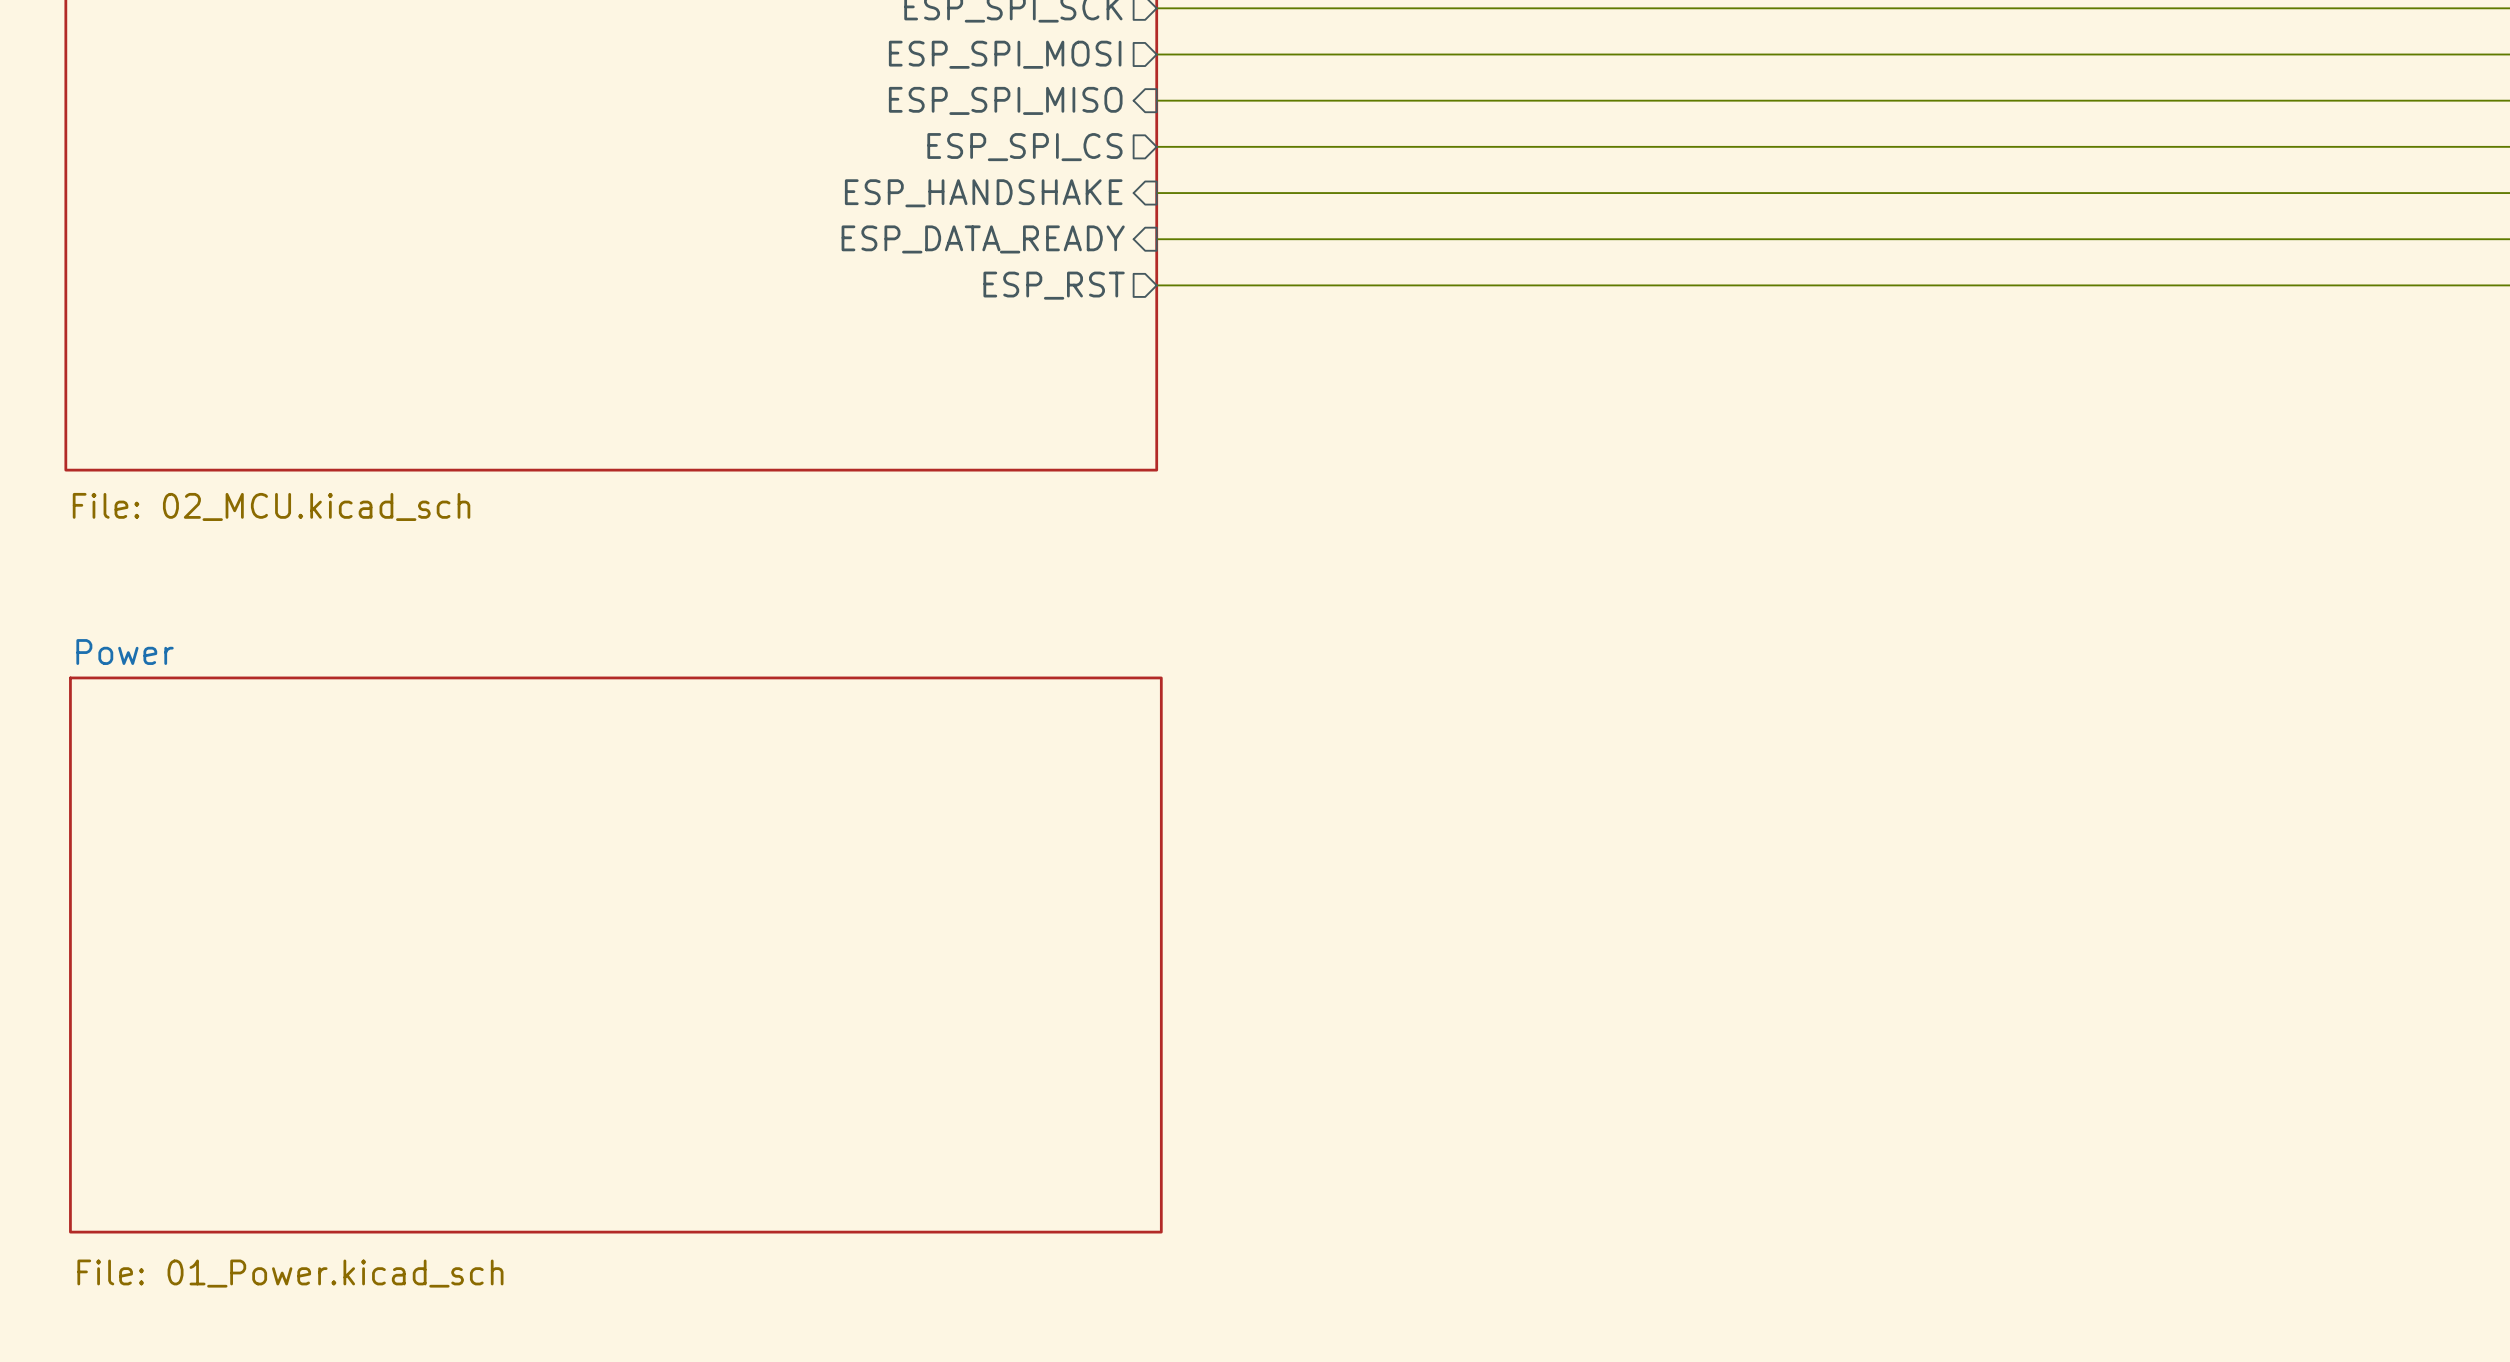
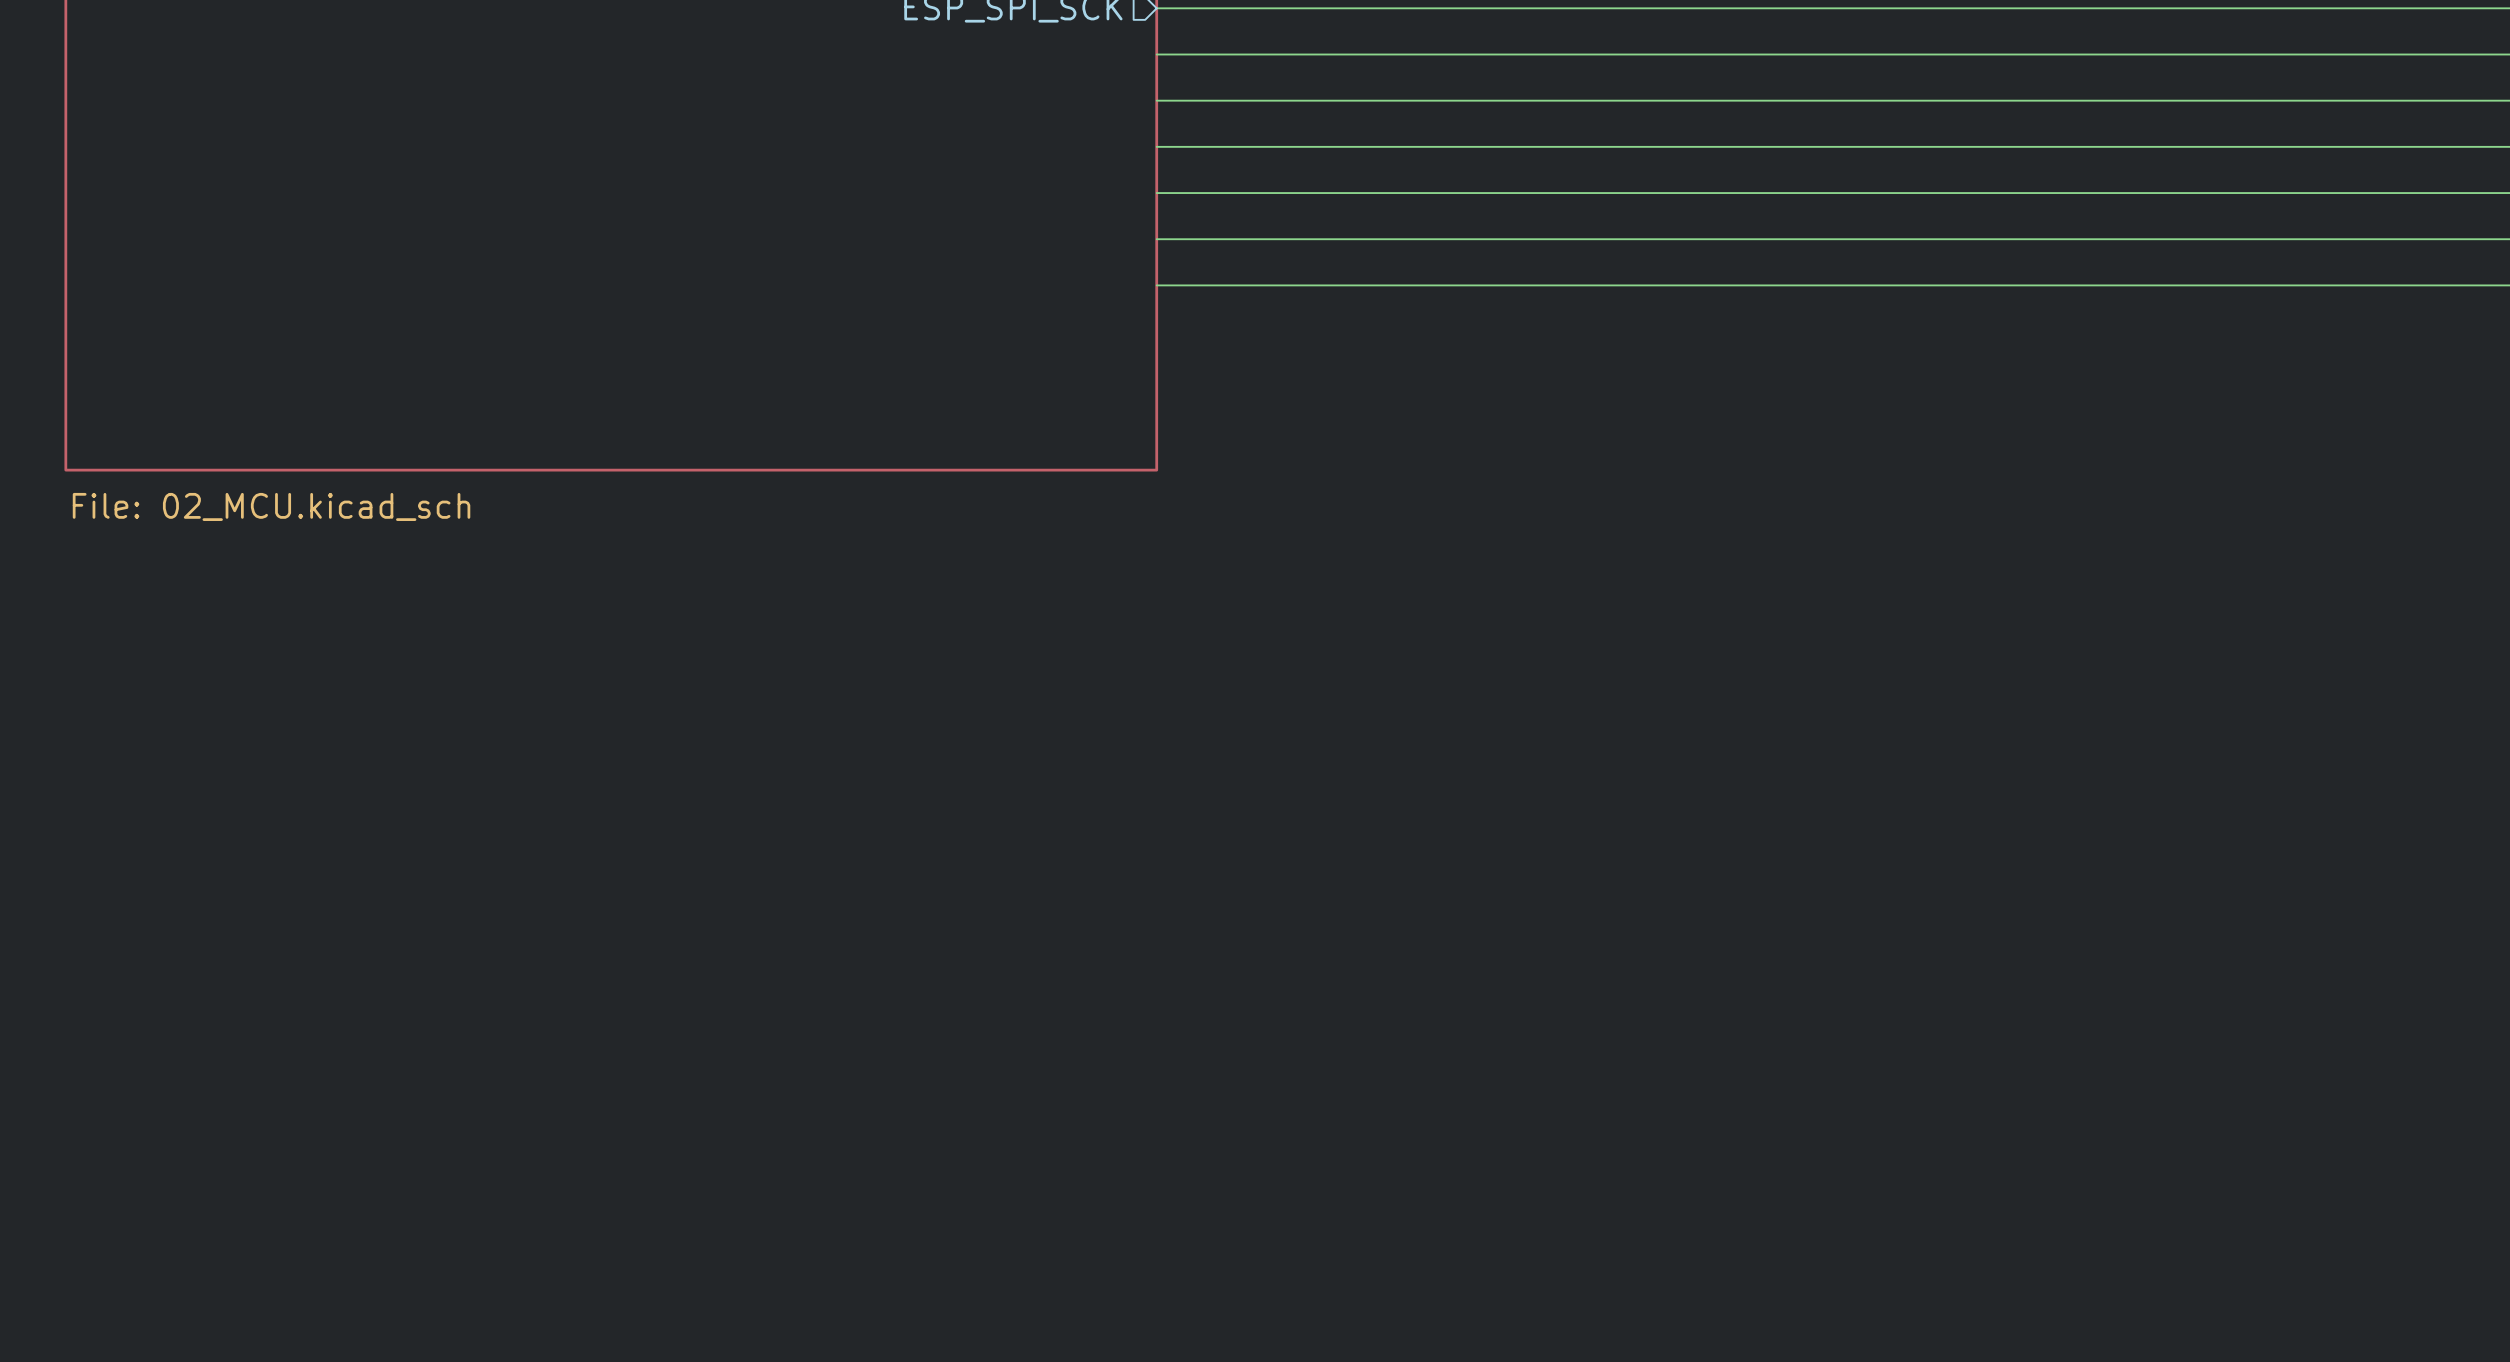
sheet pin: ESP_SPI_MOSI (1005, 54) -> none
sheet pin: ESP_SPI_MISO (1005, 100) -> none
sheet pin: ESP_SPI_CS (1024, 147) -> none
sheet pin: ESP_HANDSHAKE (983, 193) -> none
sheet pin: ESP_DATA_READY (983, 239) -> none
sheet pin: ESP_RST (1054, 285) -> none
sheet Power: File: 01_Power.kicad_sch (615, 955) -> none

